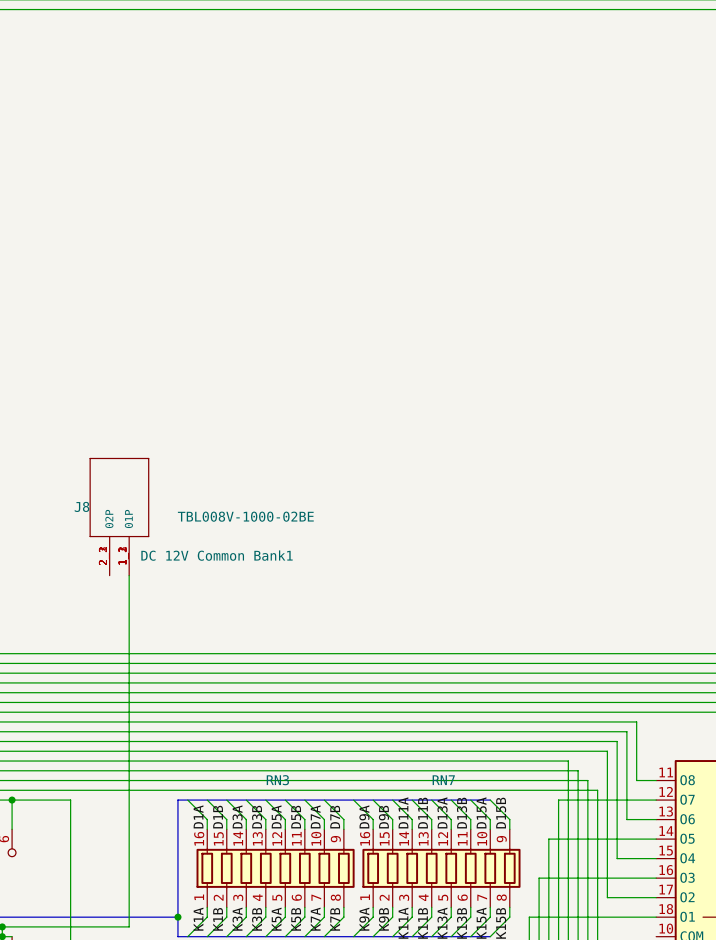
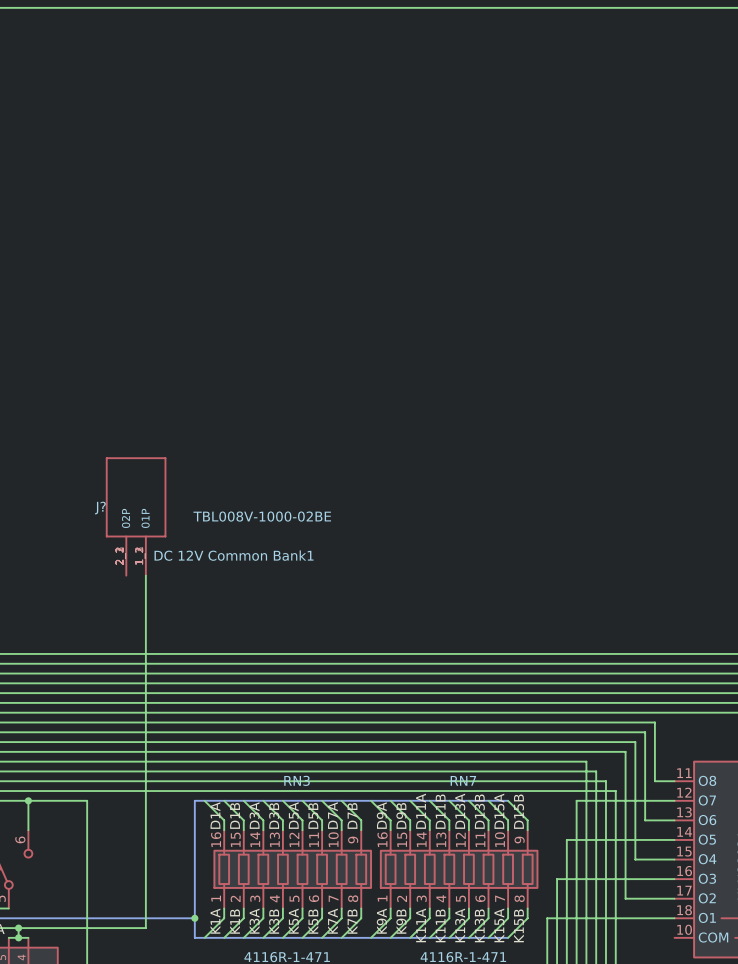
J8 name: J8 (82, 506) -> J? (100, 508)

